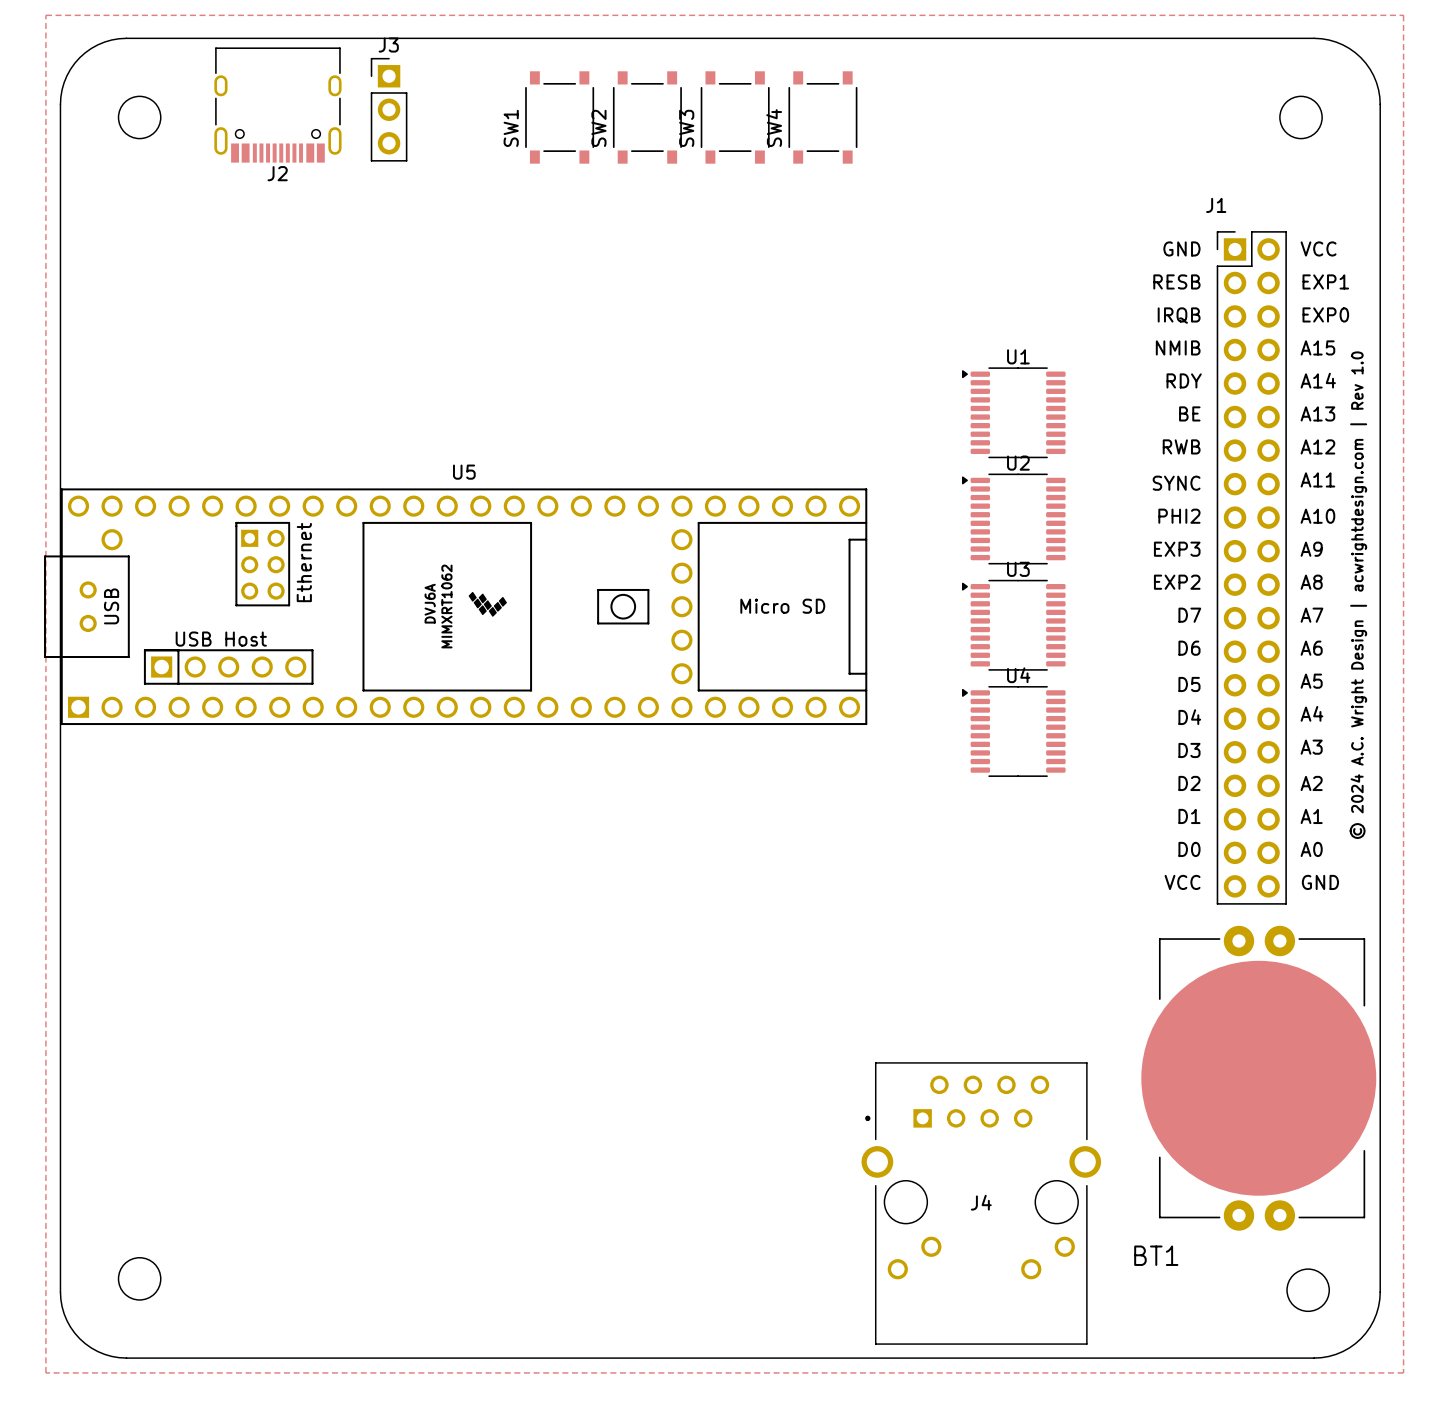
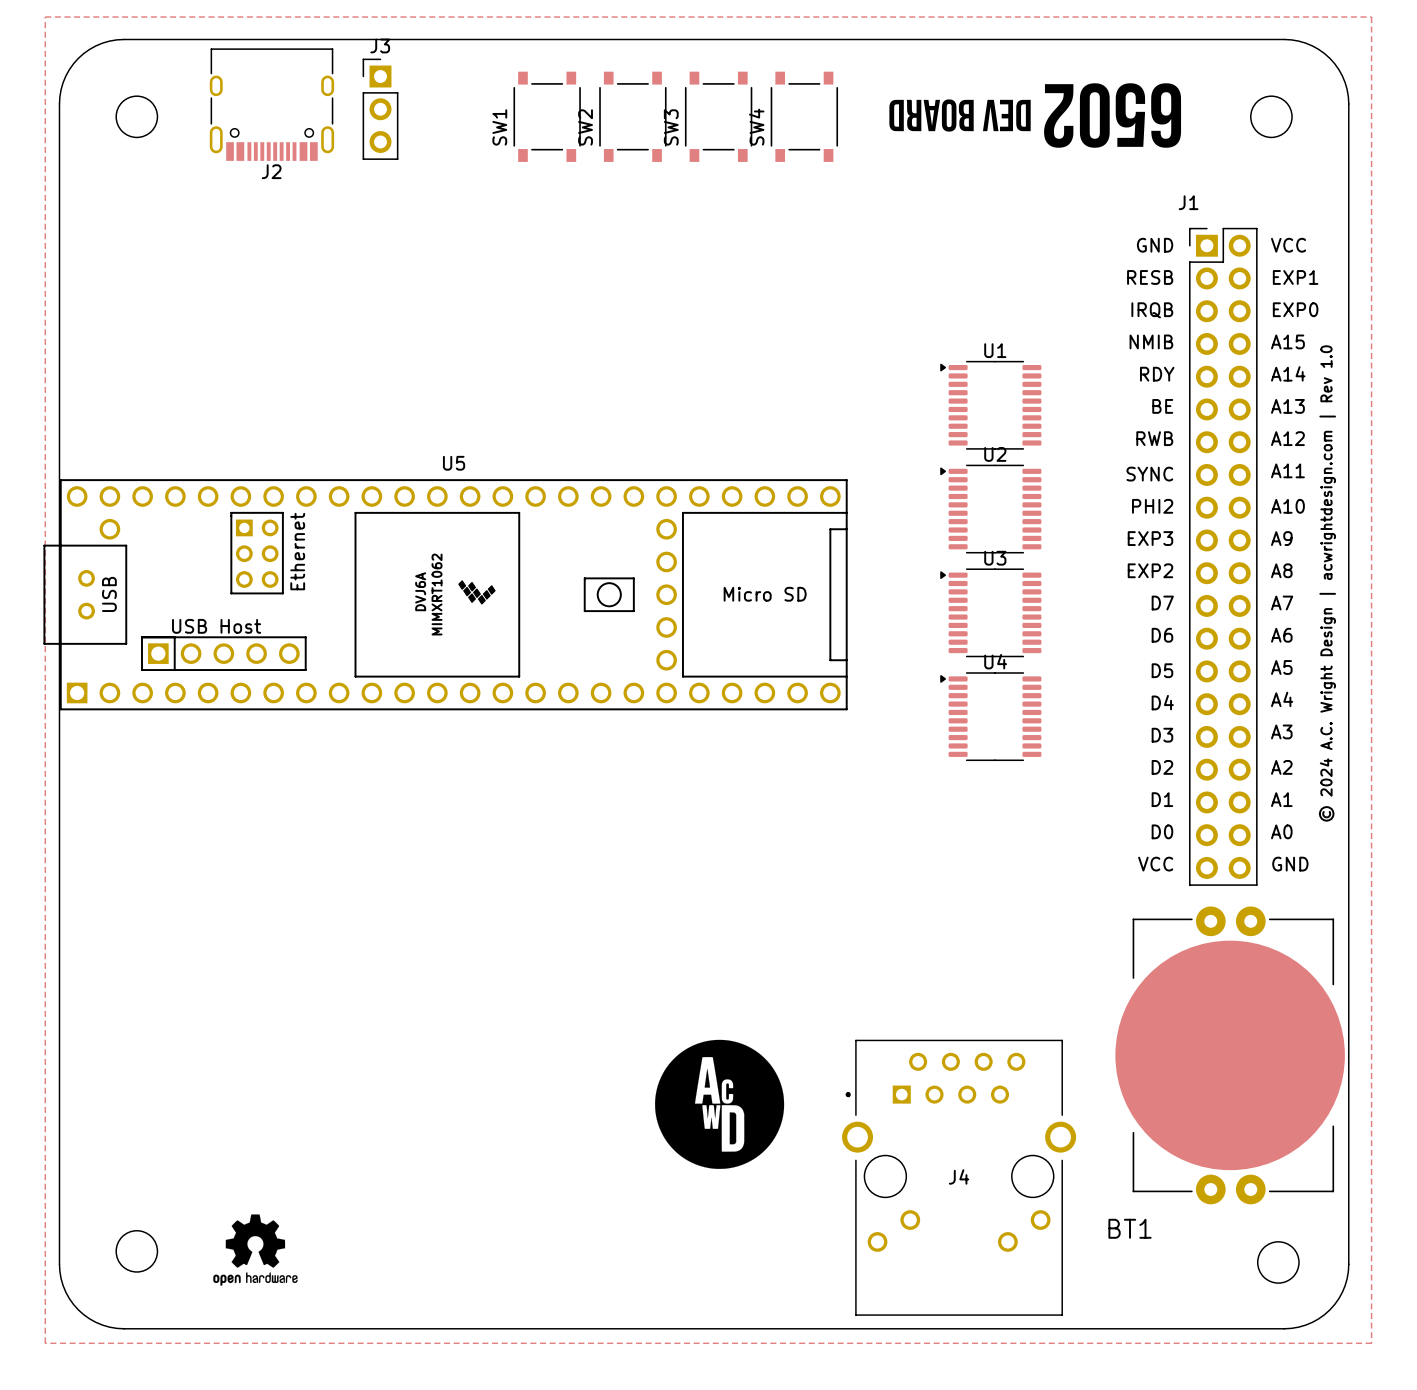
drawing: none -> [889, 83, 1182, 148]
drawing: none -> [655, 1039, 785, 1169]
drawing: none -> [213, 1214, 298, 1286]

